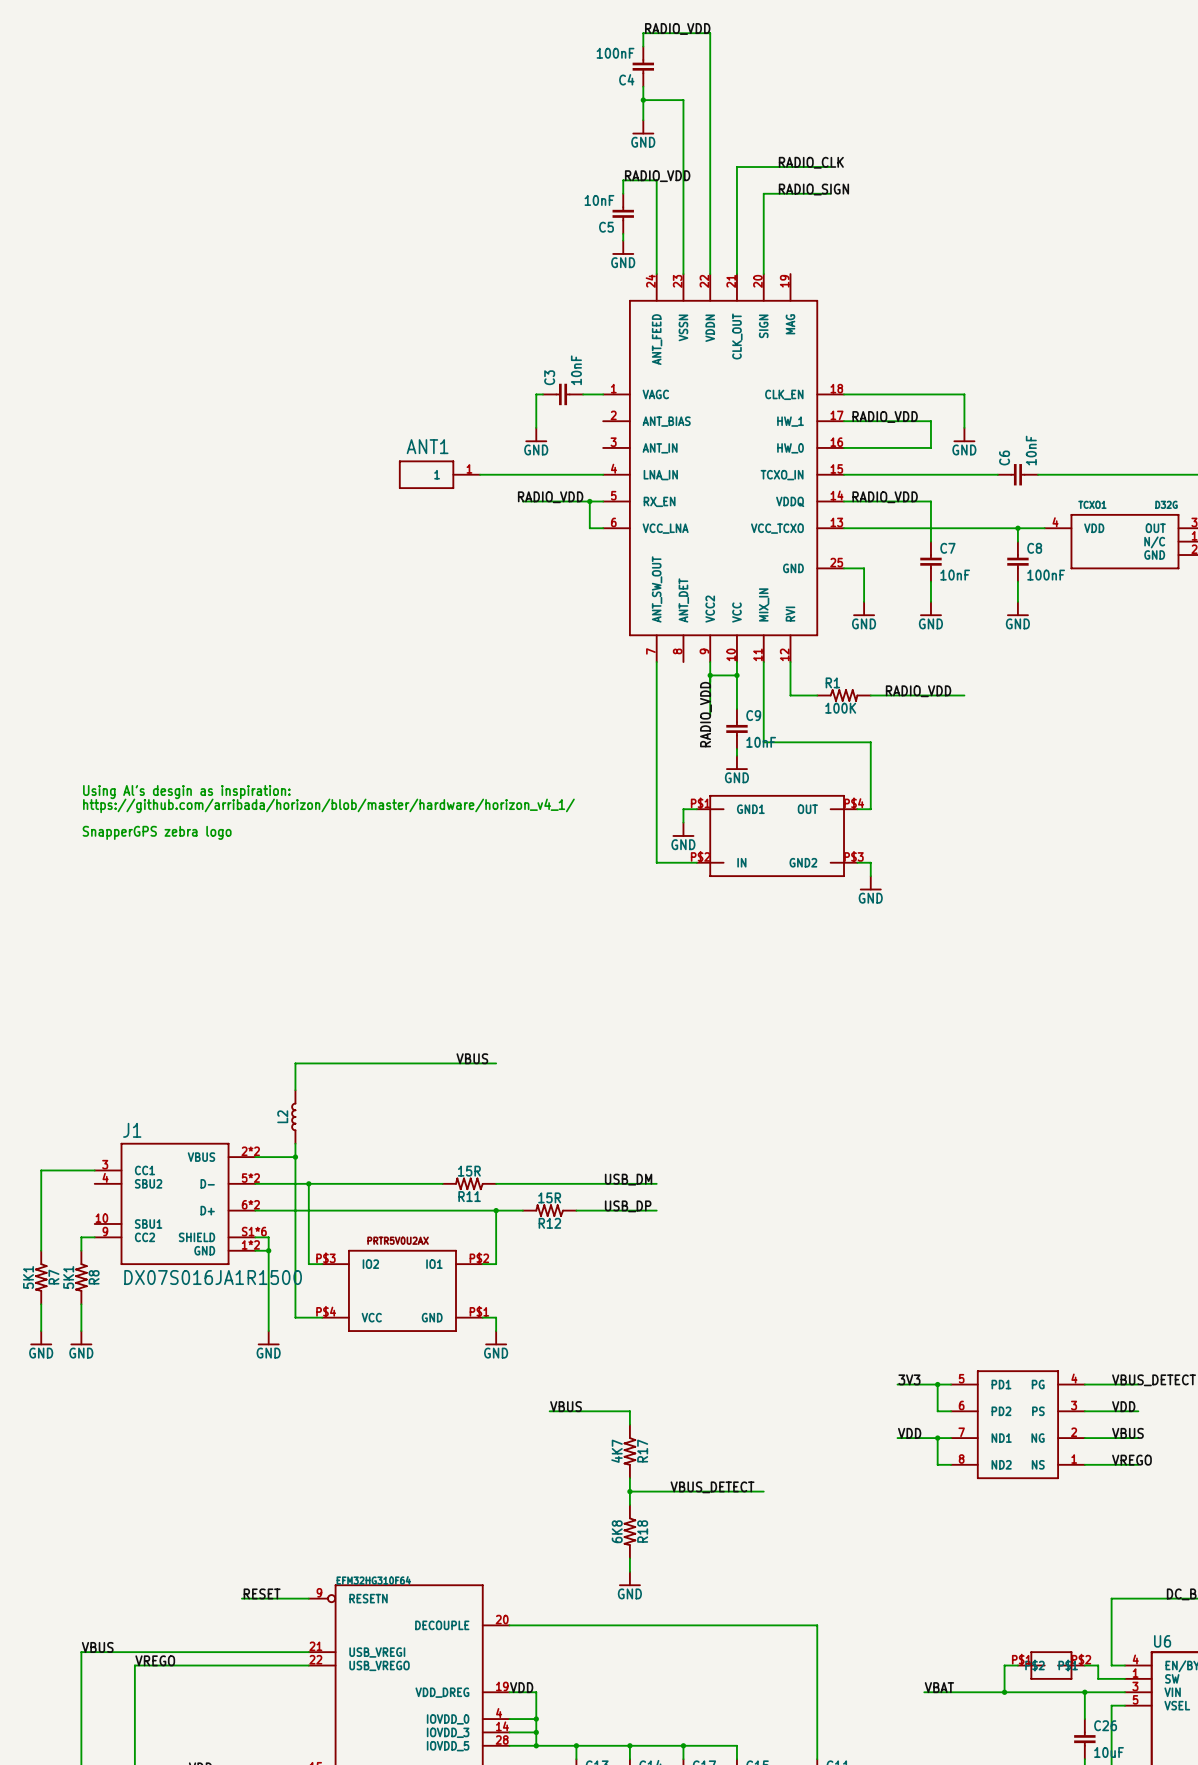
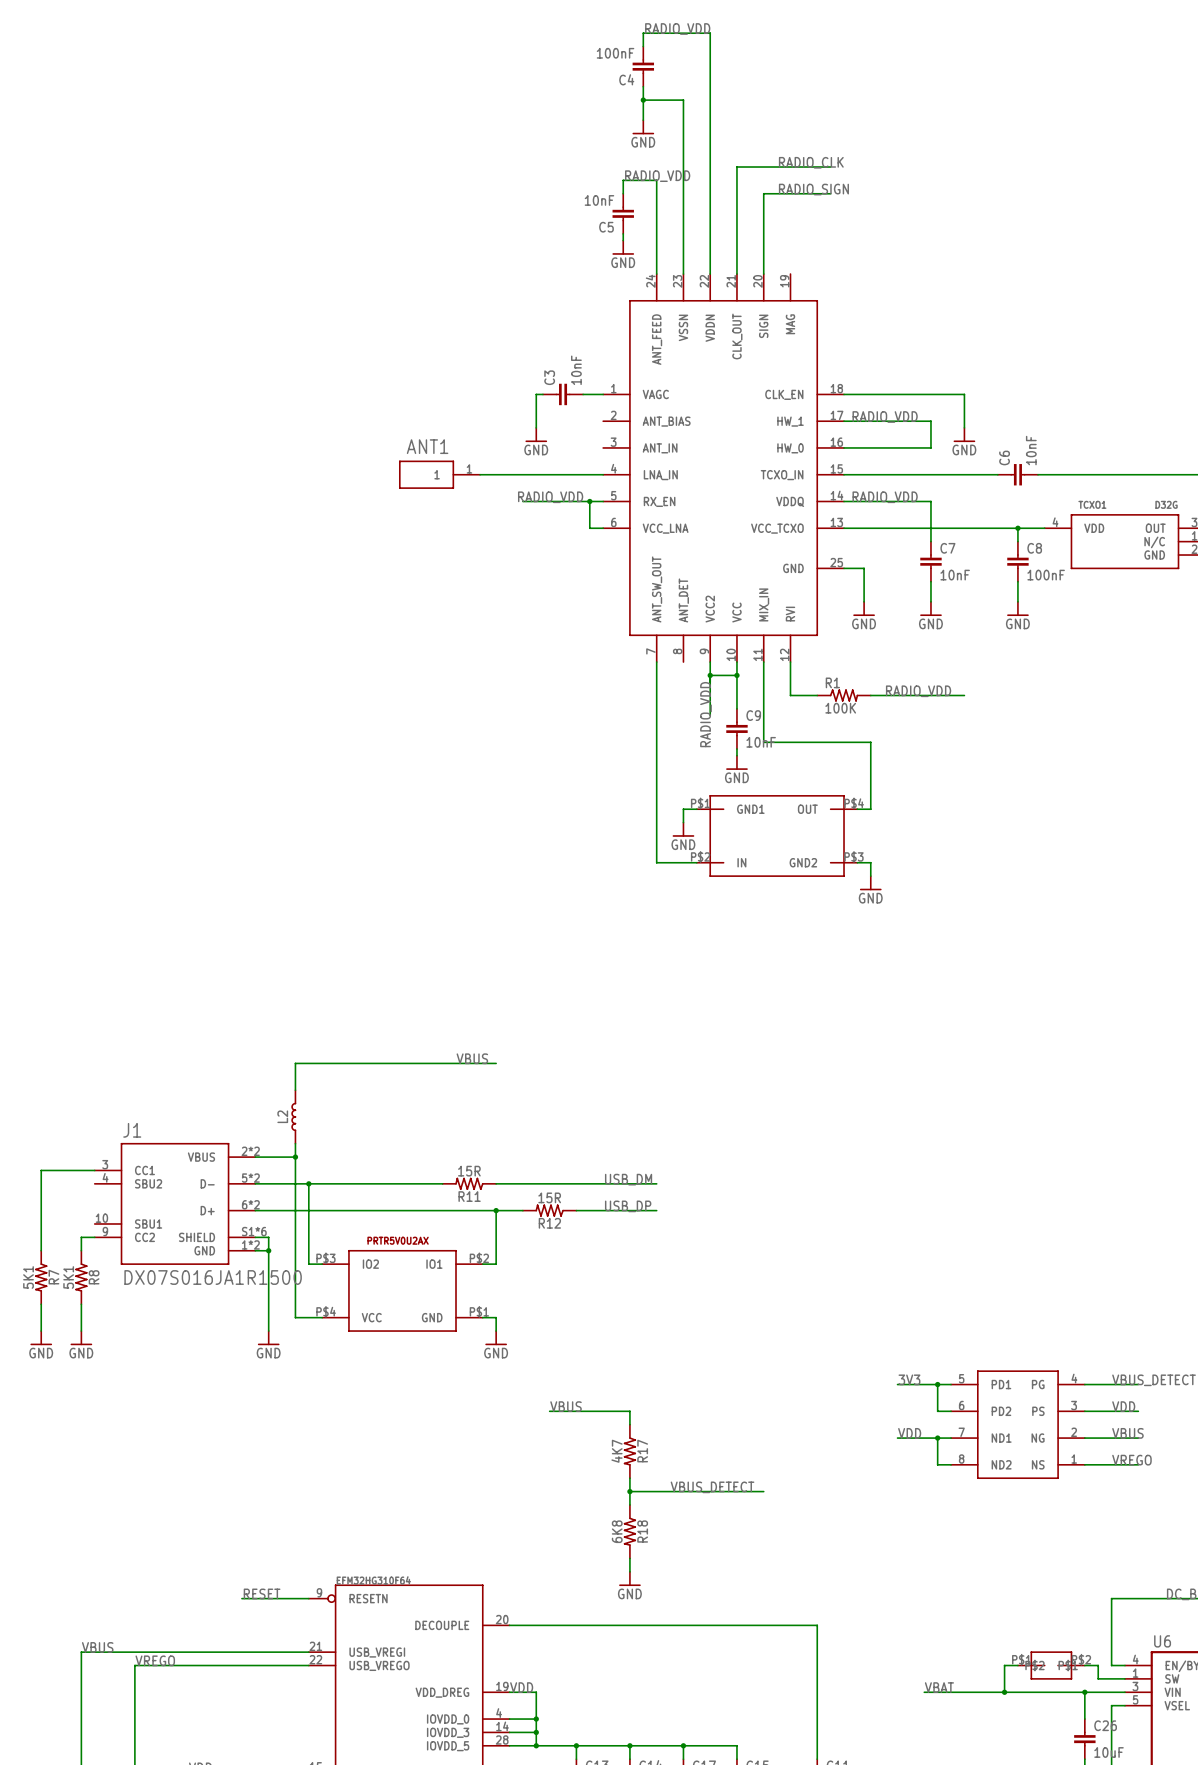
text: Using Al's desgin as inspiration: (186, 792) -> none
text: https://github.com/arribada/horizon/blob/master/hardware/horizon_v4_1/ (328, 805) -> none
text: SnapperGPS zebra logo (157, 832) -> none

